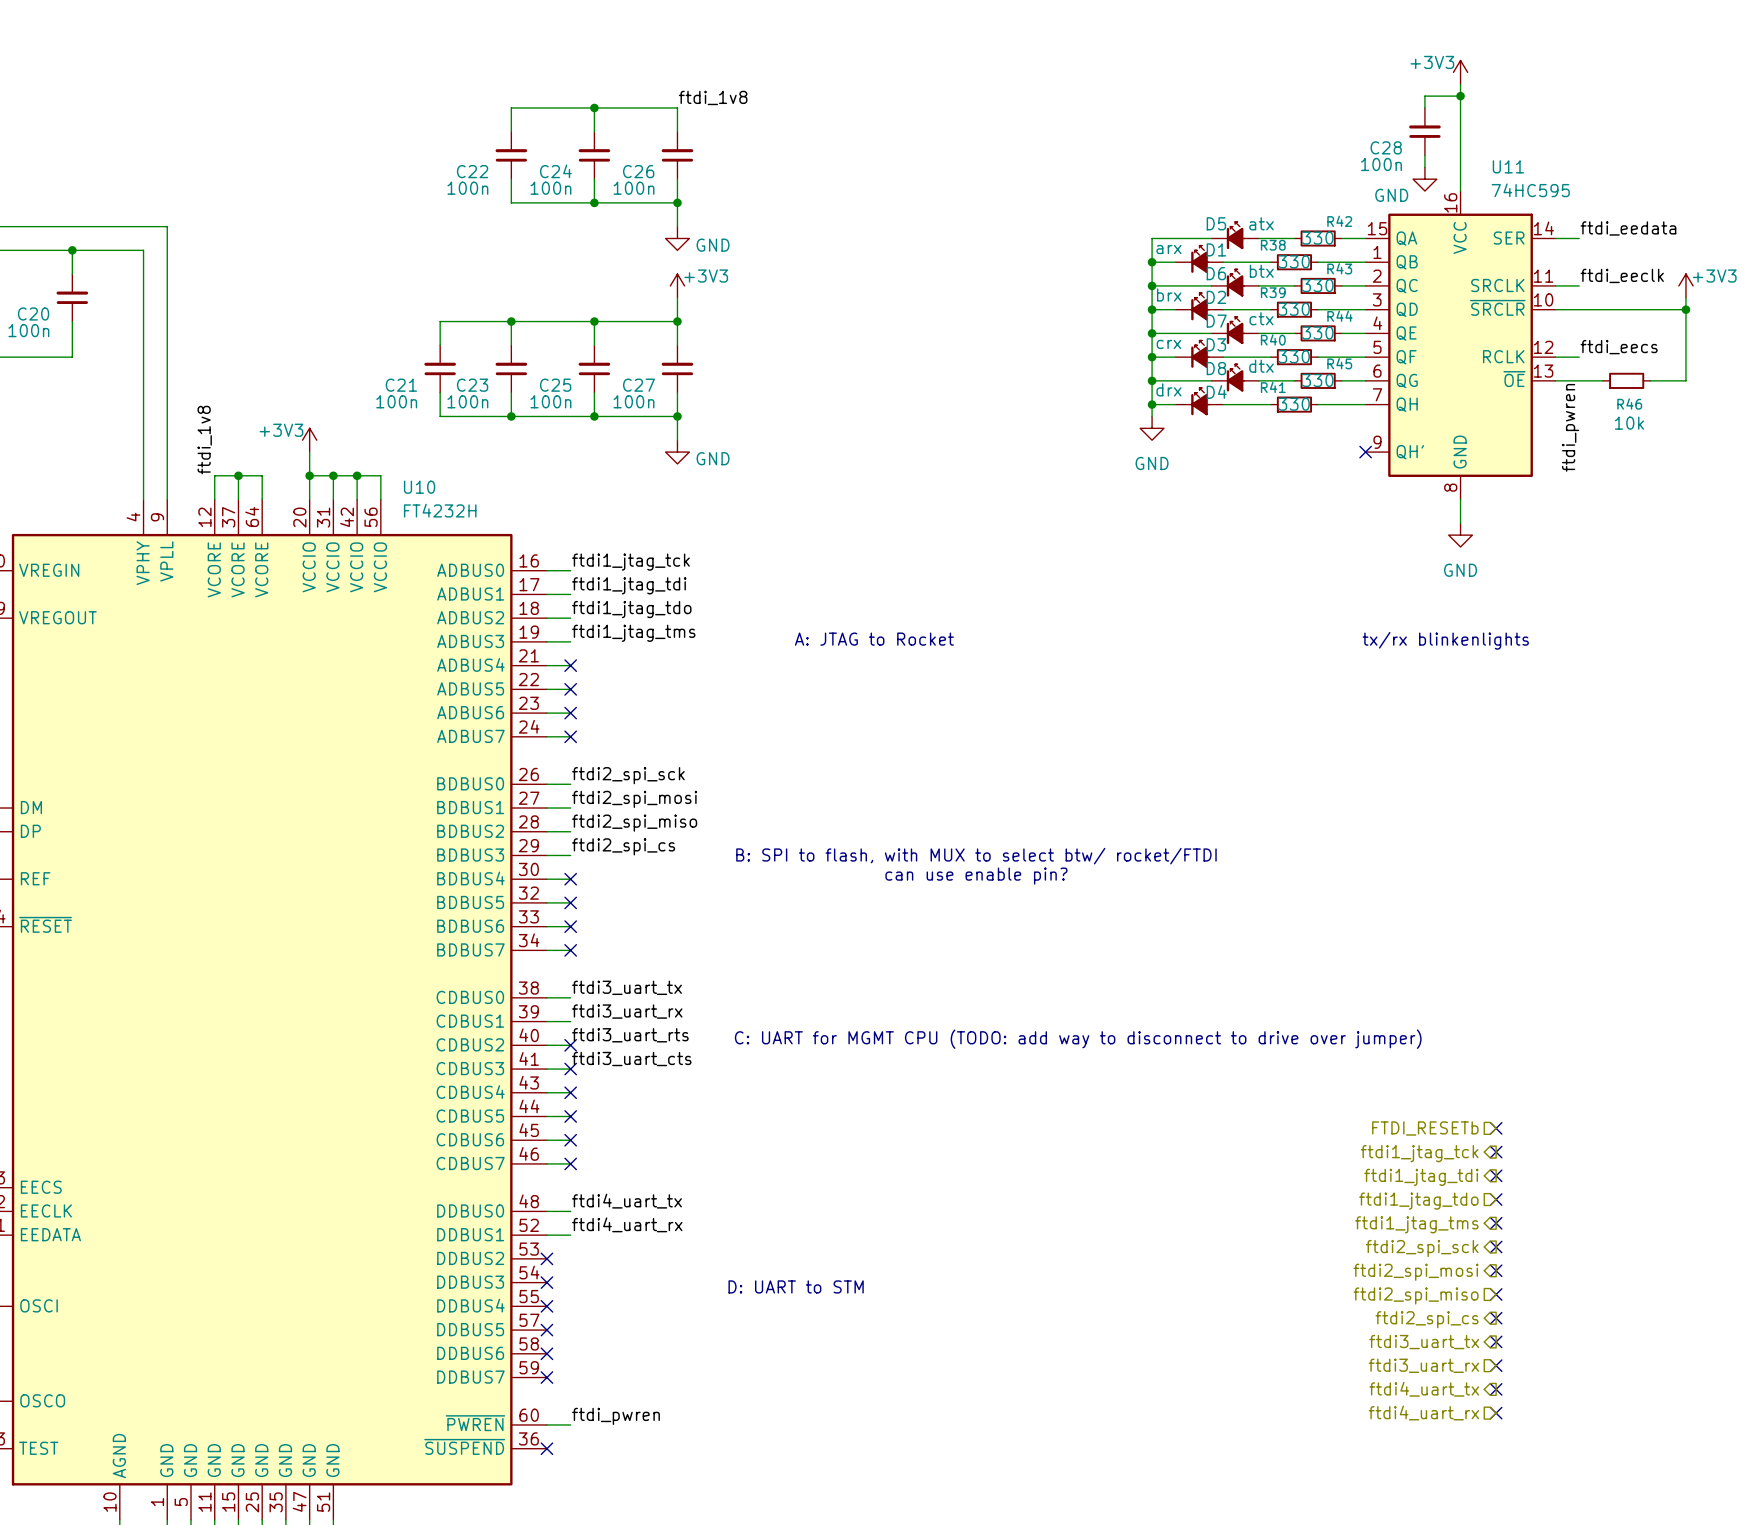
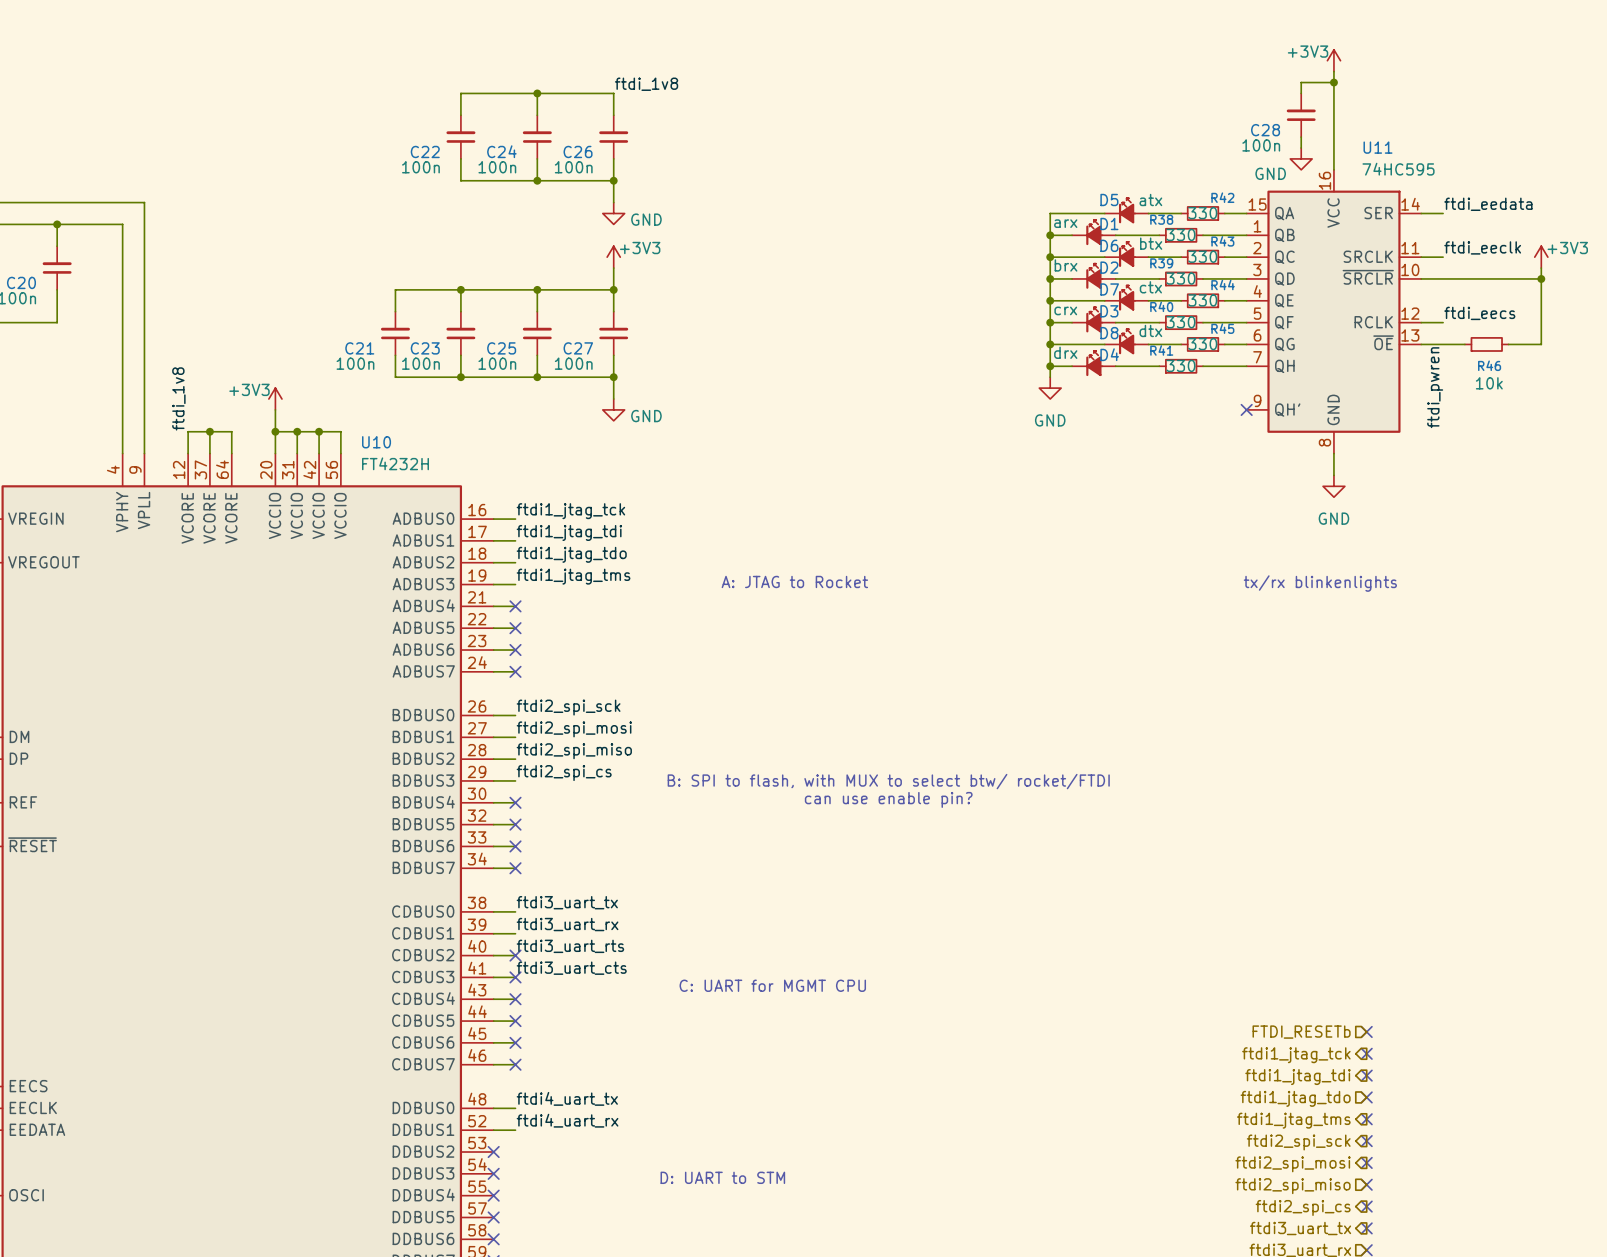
text: C: UART for MGMT CPU (TODO: add way to disconnect to drive over jumper) (1078, 1039) -> none
text: none -> C: UART for MGMT CPU (772, 985)

